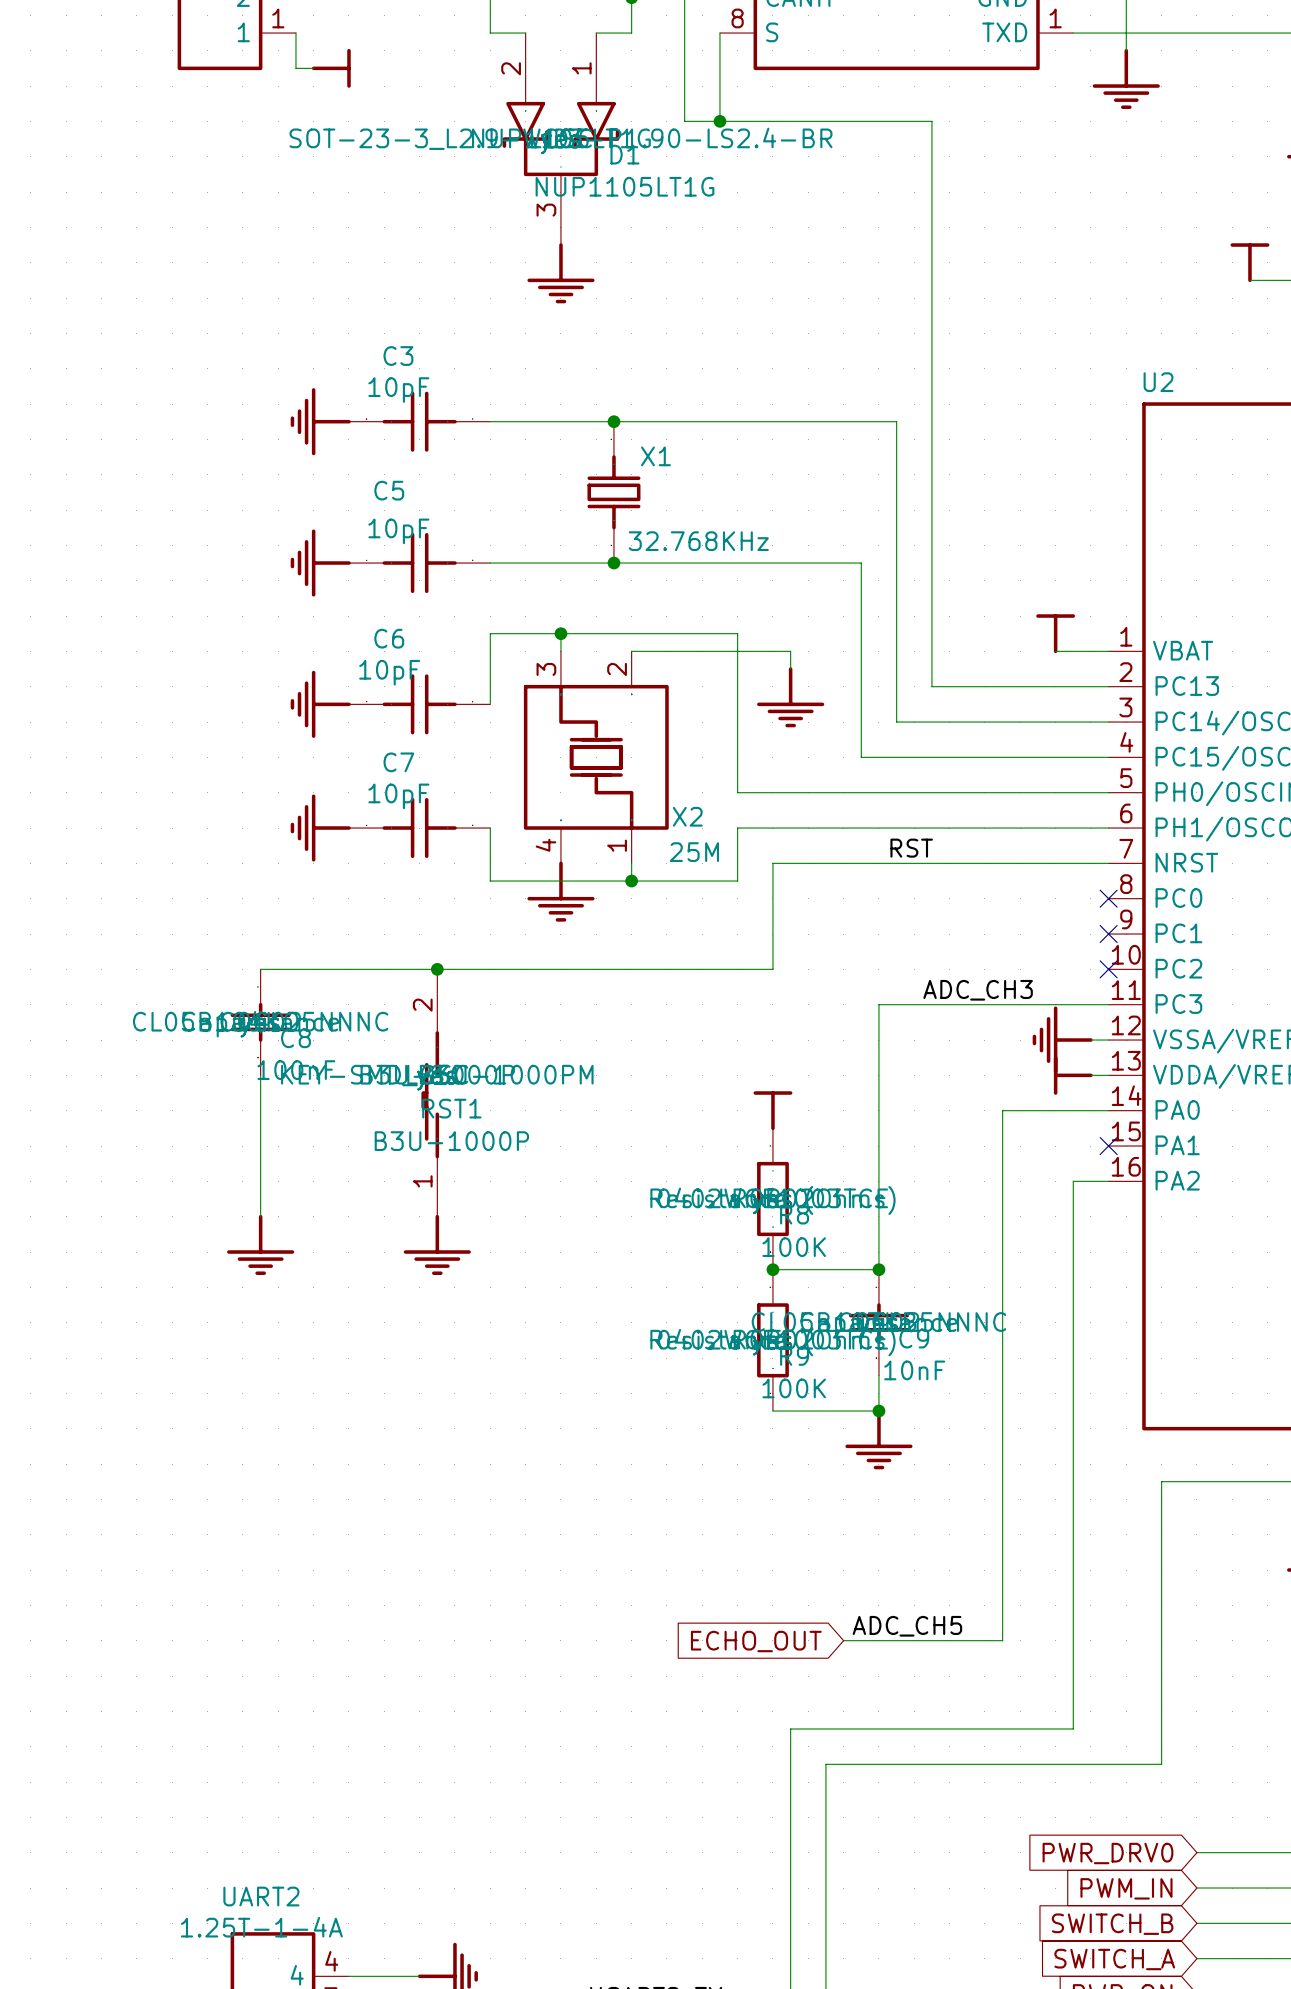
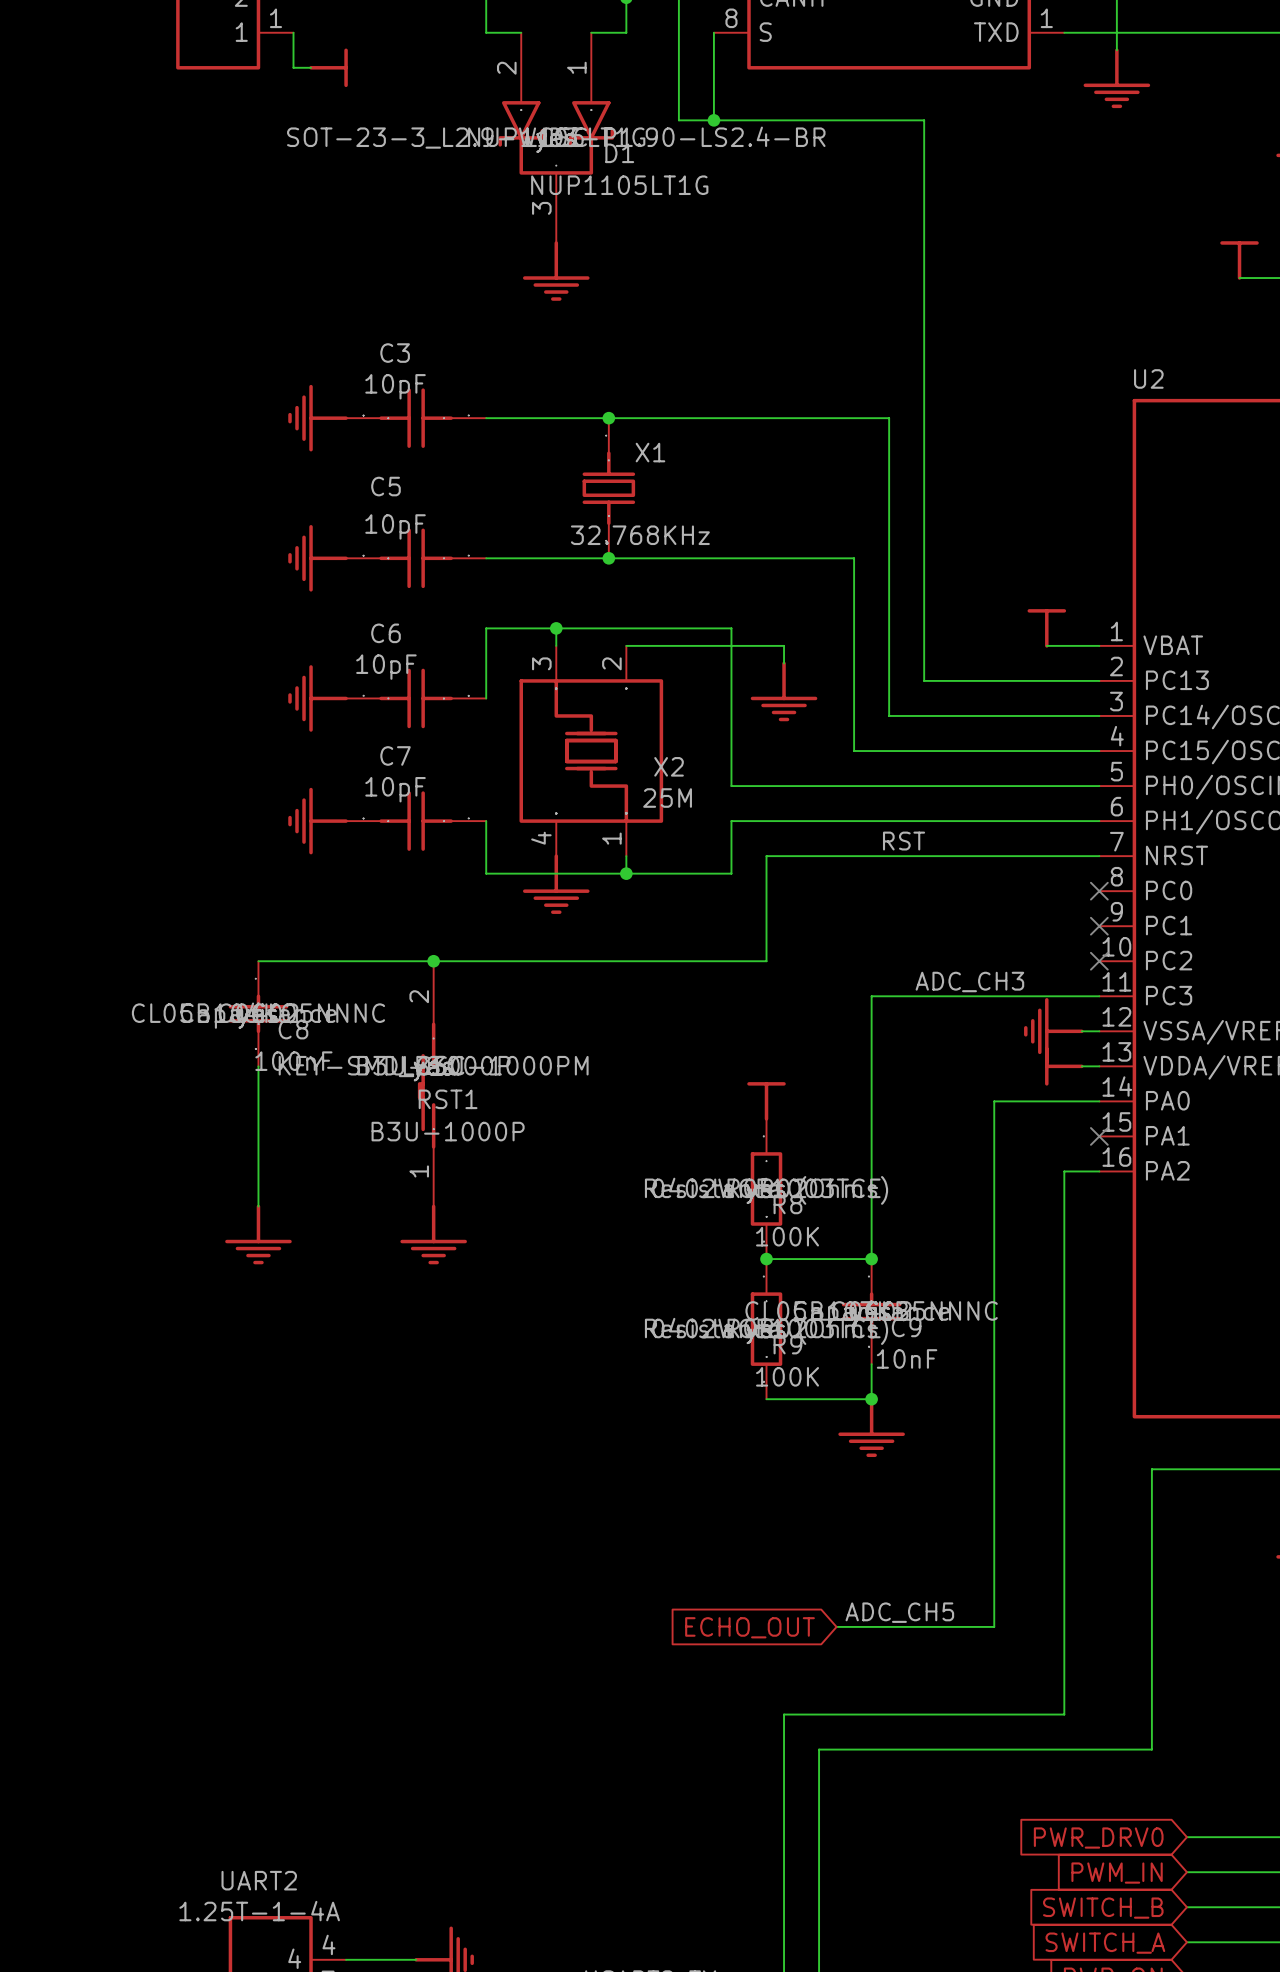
X1 value position: 32.768KHz (698, 541) -> 32.768KHz (640, 535)
X2 name position: X2 (687, 816) -> X2 (669, 766)
X2 value position: 25M (694, 852) -> 25M (667, 798)

